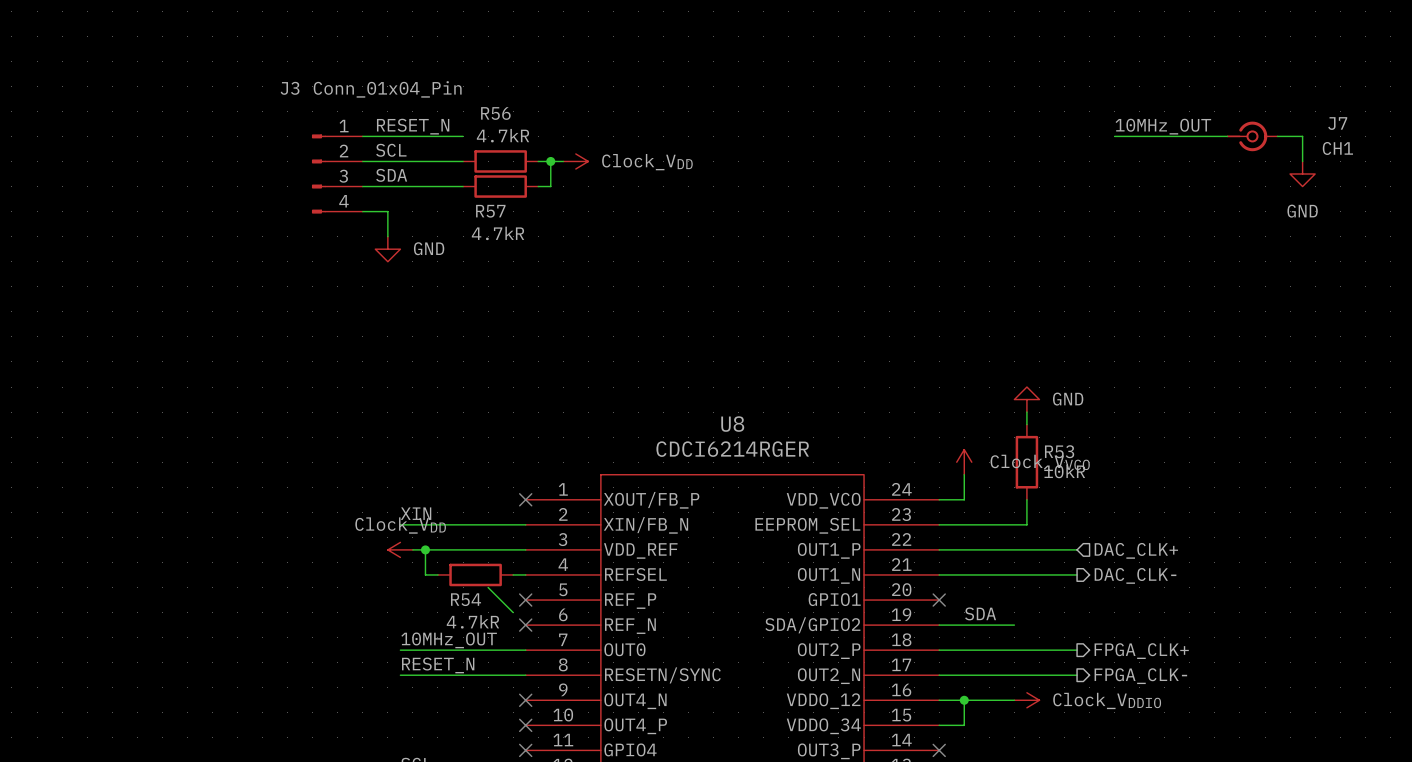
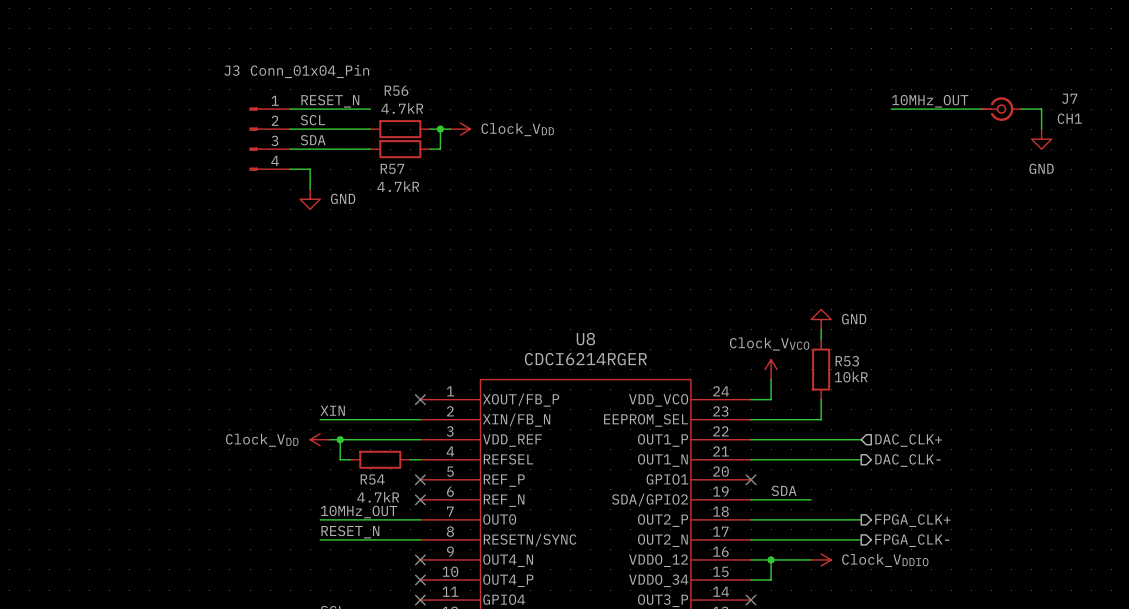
power symbol text position: Clock_VVCO (1040, 462) -> Clock_VVCO (769, 344)
power symbol text position: Clock_VDD (400, 525) -> Clock_VDD (262, 440)
wire: (488, 587) (513, 612) -> none

